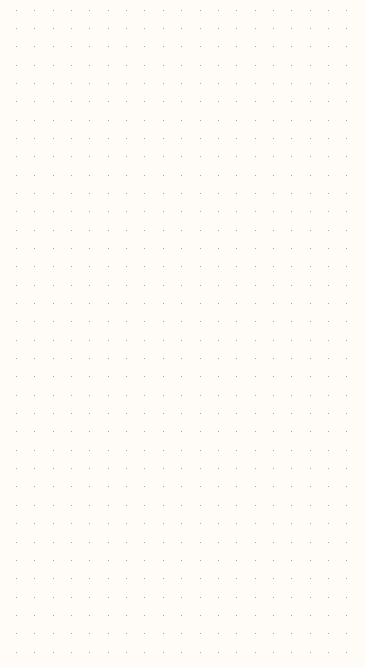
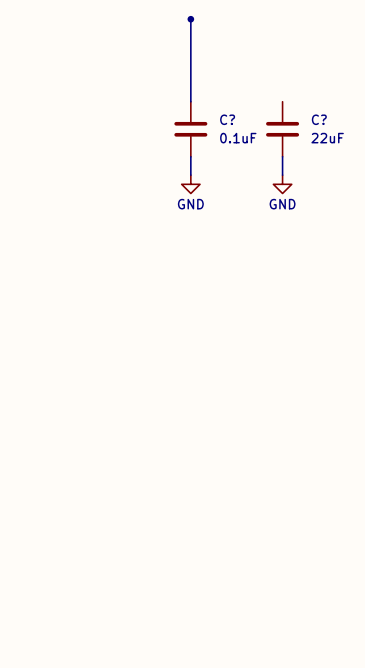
wire: none -> (190, 19) (190, 101)
junction: none -> (190, 19)
C?: none -> 0.1uF (190, 129)
C?: none -> 22uF (282, 129)
wire: none -> (190, 156) (190, 175)
wire: none -> (282, 156) (282, 175)
power symbol: none -> GND (190, 184)
power symbol: none -> GND (282, 184)

